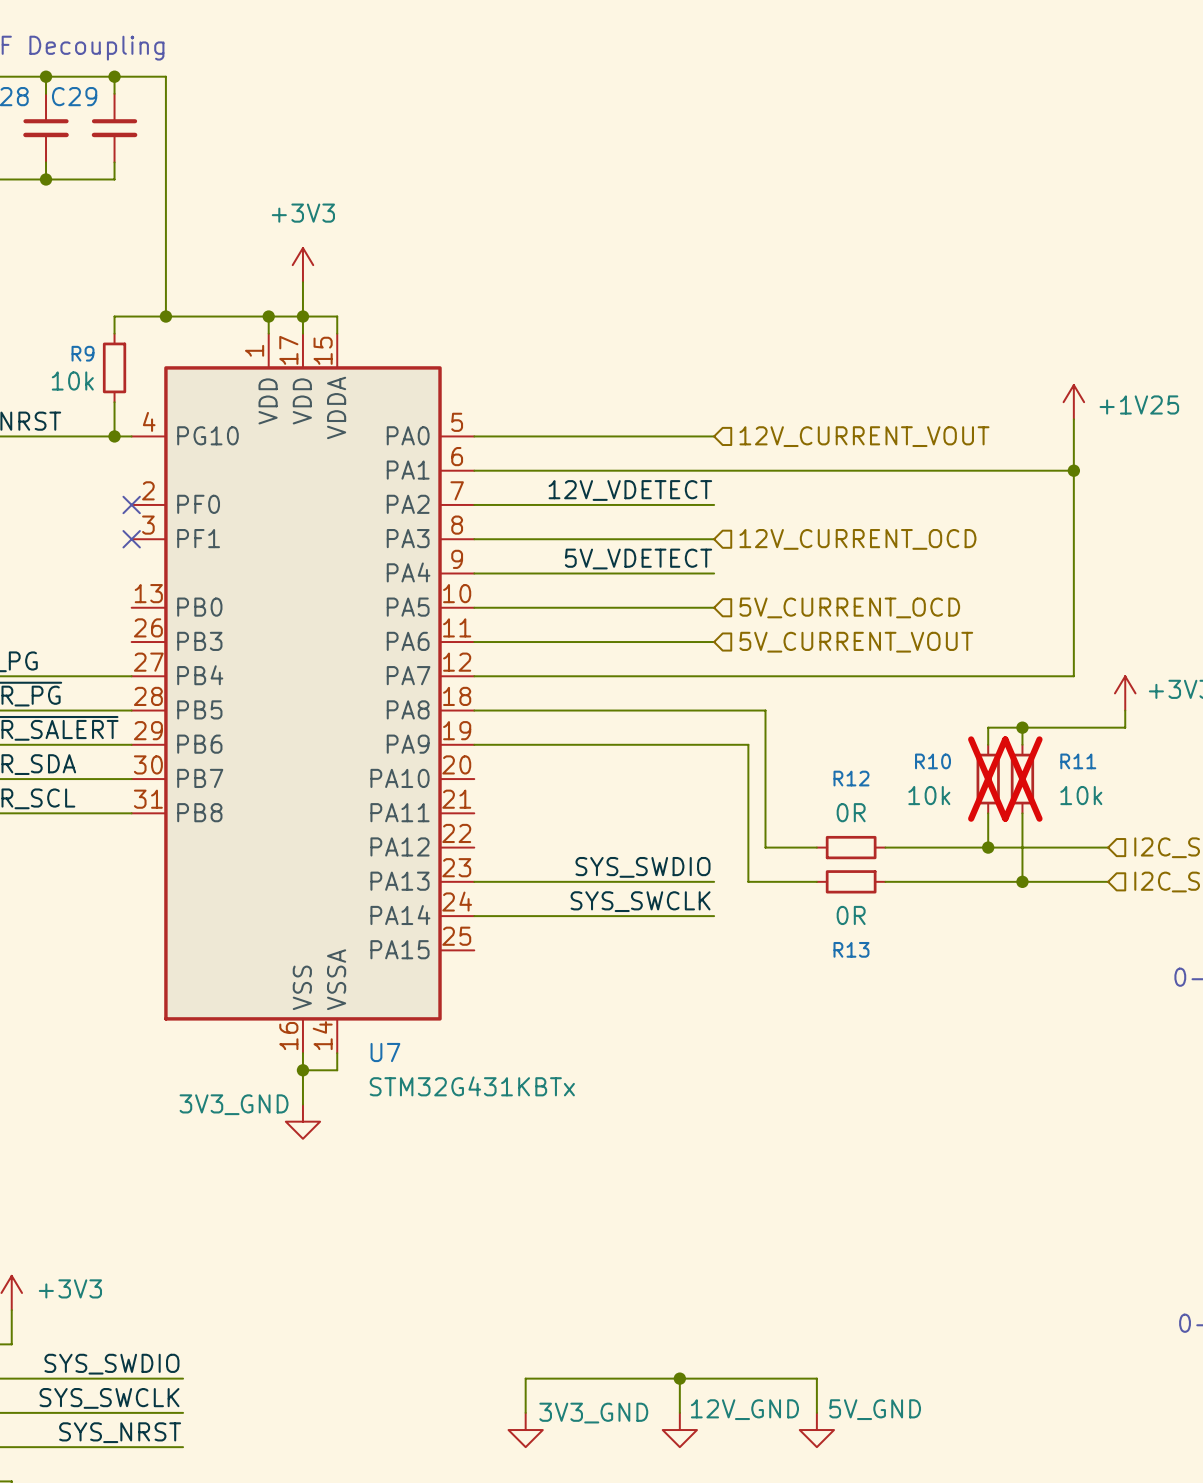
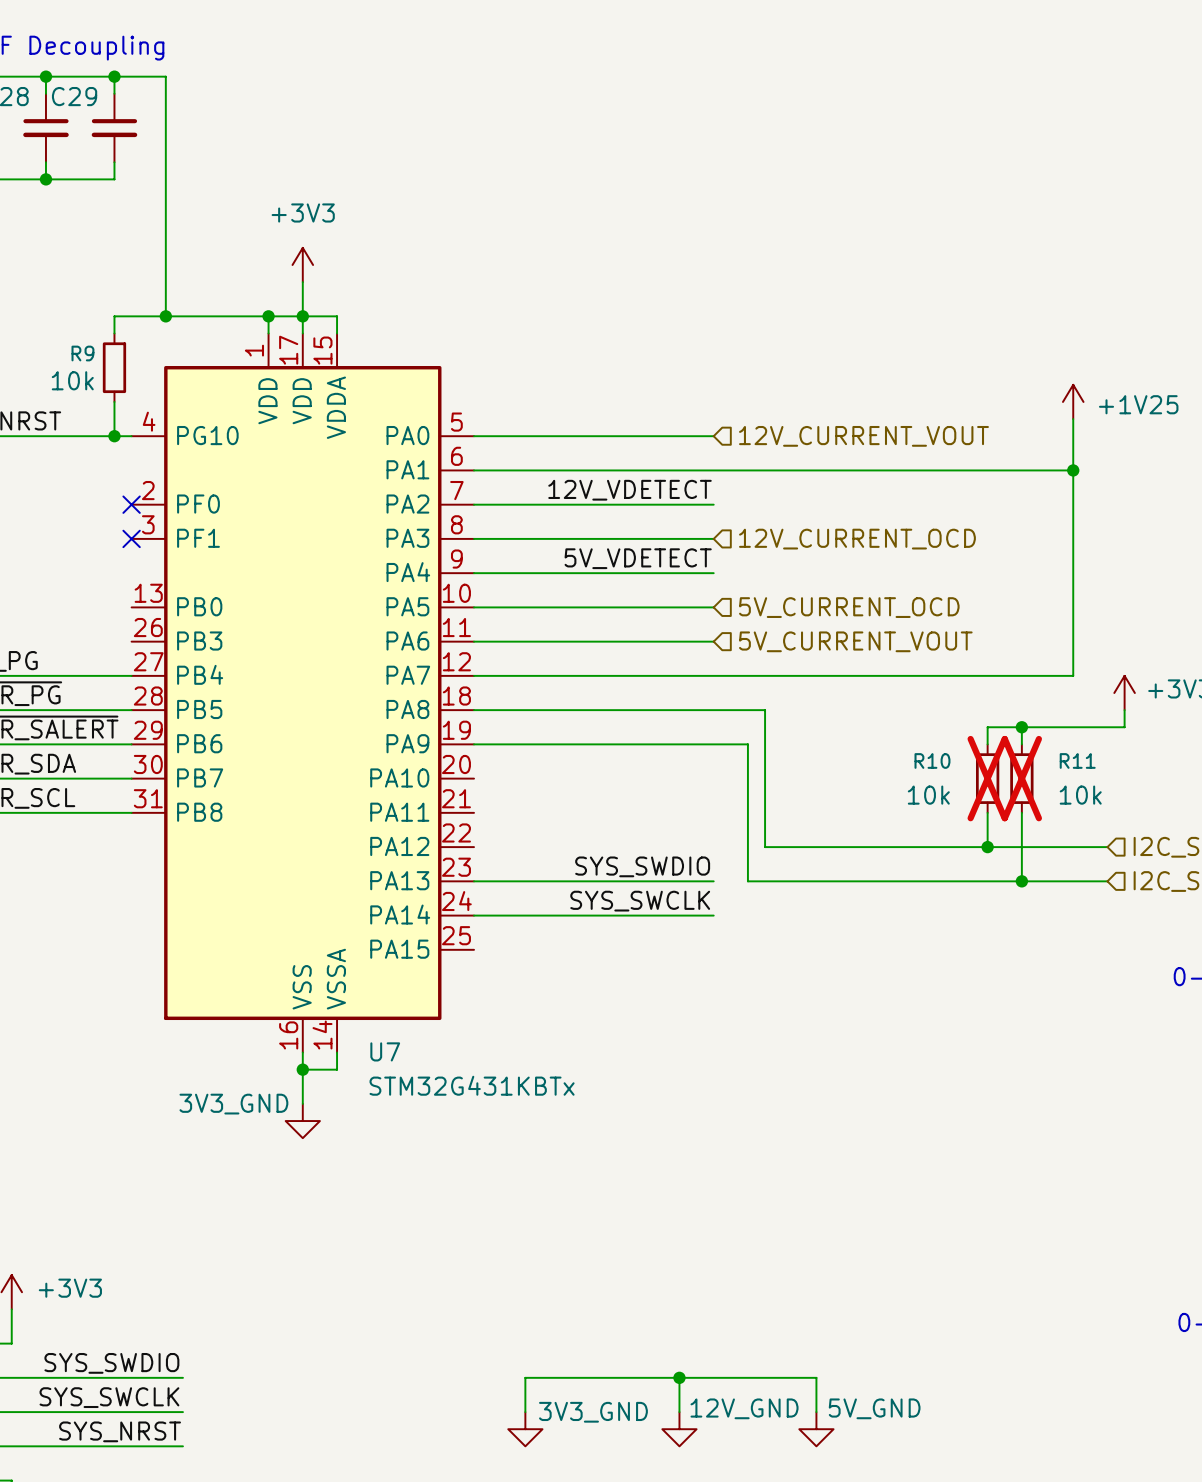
wire: none -> (816, 847) (884, 847)
R12: 0R (851, 847) -> none
wire: none -> (816, 881) (884, 881)
R13: 0R (851, 881) -> none

